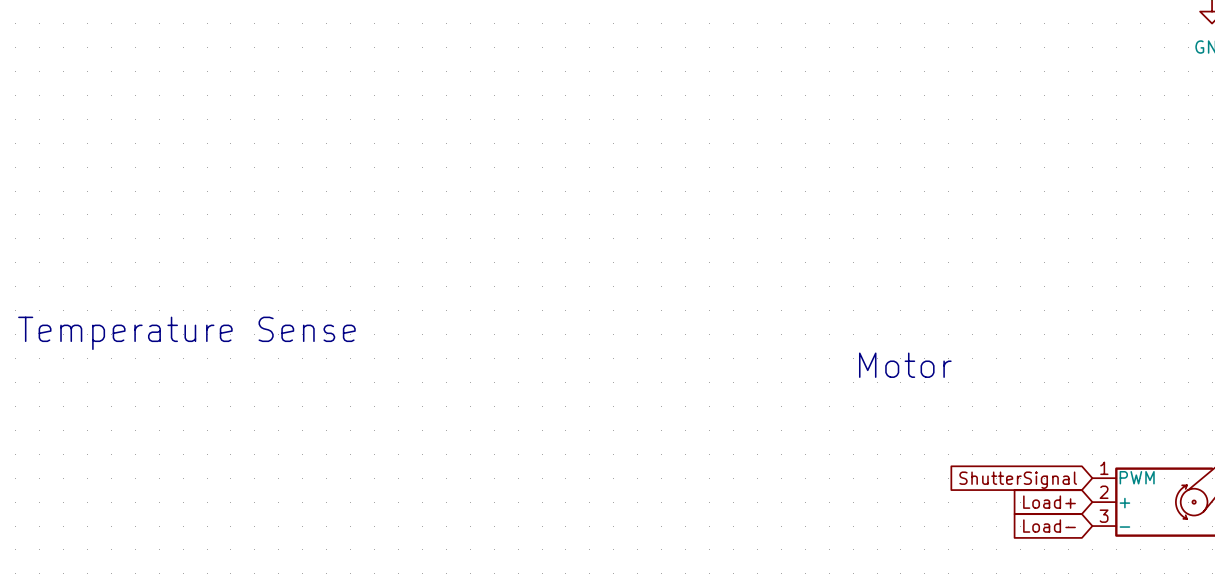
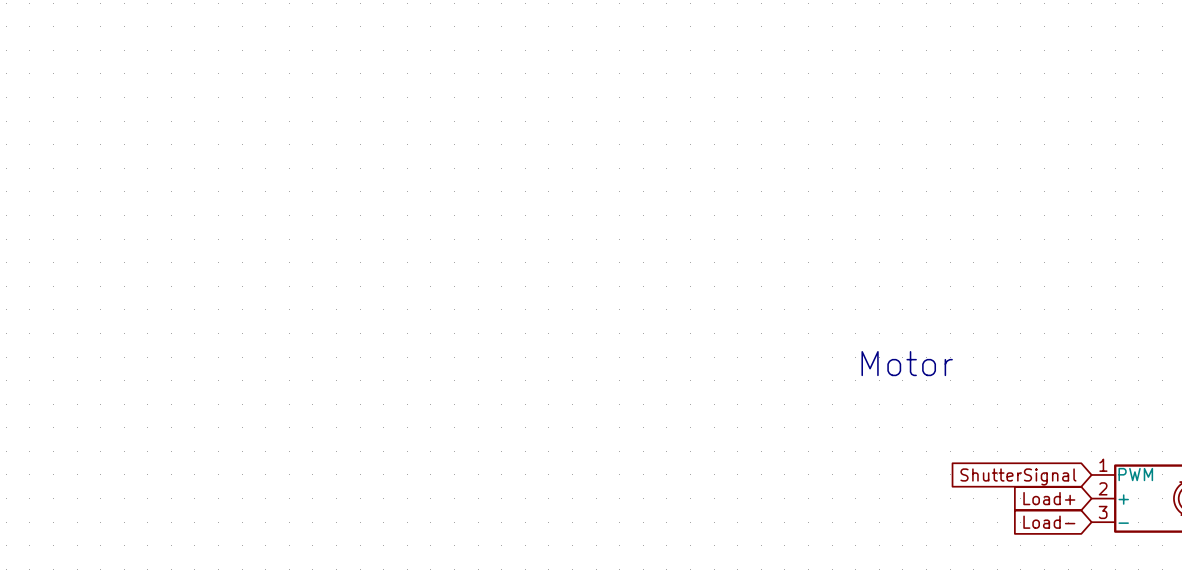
text: Temperature Sense (186, 333) -> none

